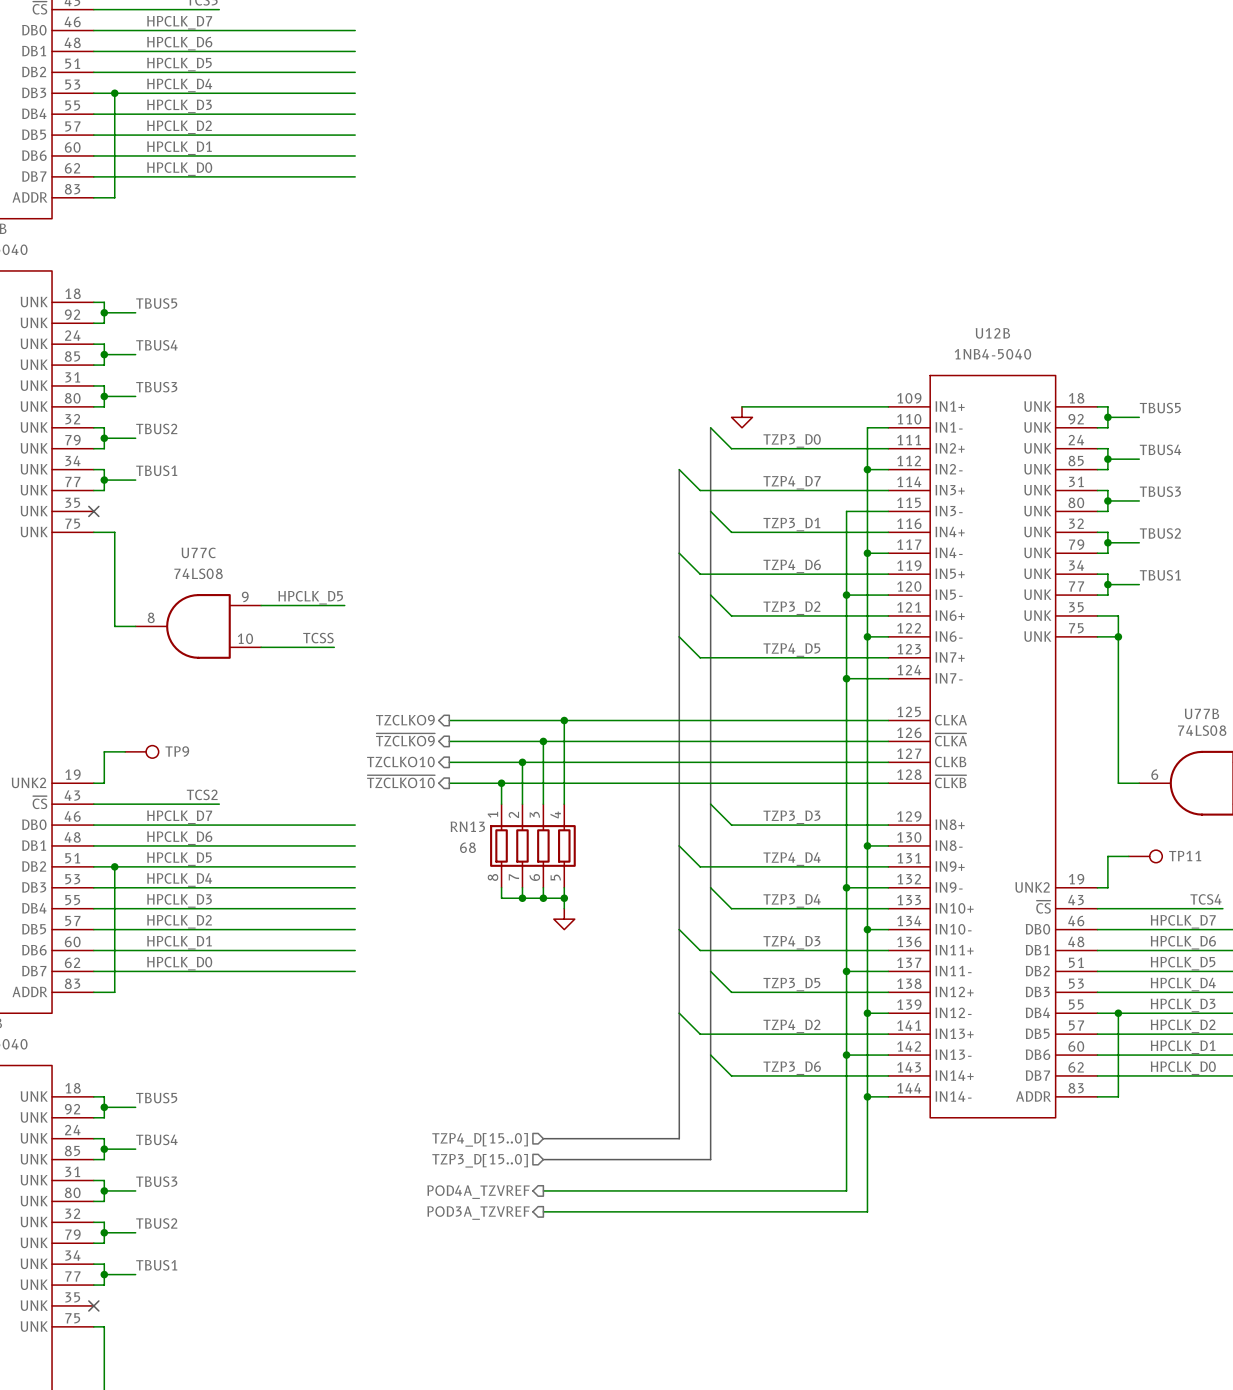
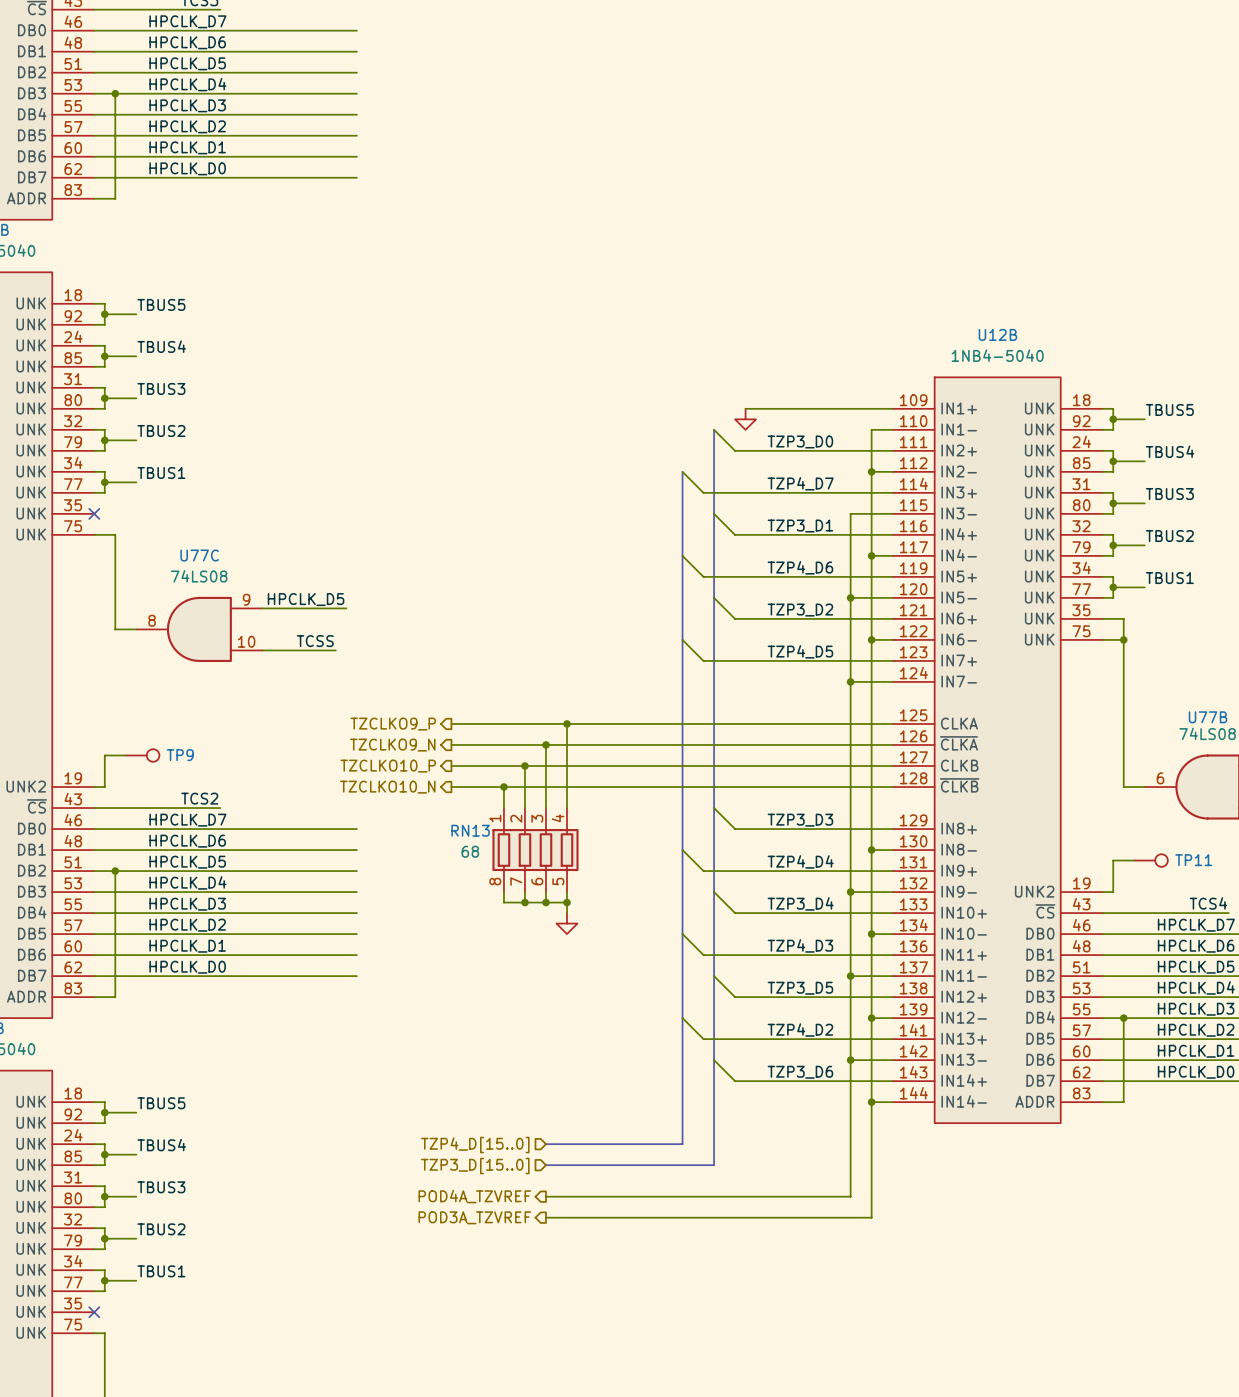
hierarchical label: TZCLKO9 (405, 720) -> TZCLKO9_P (393, 724)
hierarchical label: ~{TZCLKO9} (405, 739) -> TZCLKO9_N (392, 745)
hierarchical label: TZCLKO10 (400, 762) -> TZCLKO10_P (388, 766)
hierarchical label: ~{TZCLKO10} (401, 781) -> TZCLKO10_N (387, 787)

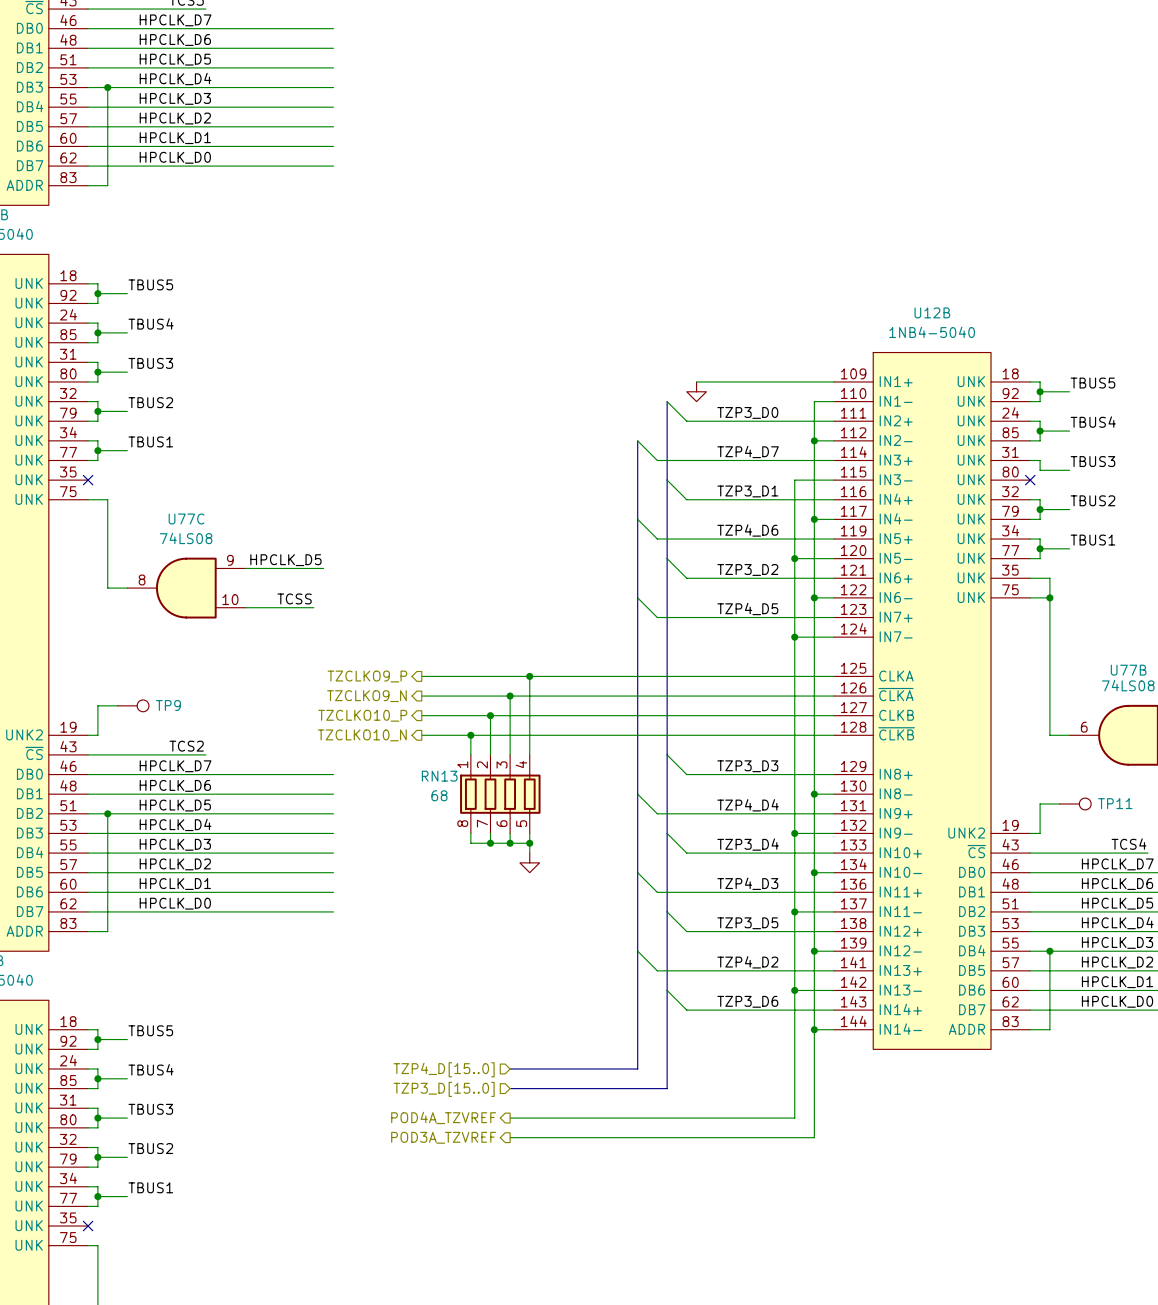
wire: (1113, 503) (1113, 513) (1102, 513) -> none
junction: (1113, 503) -> none
no-connect mark: none -> (1030, 480)

